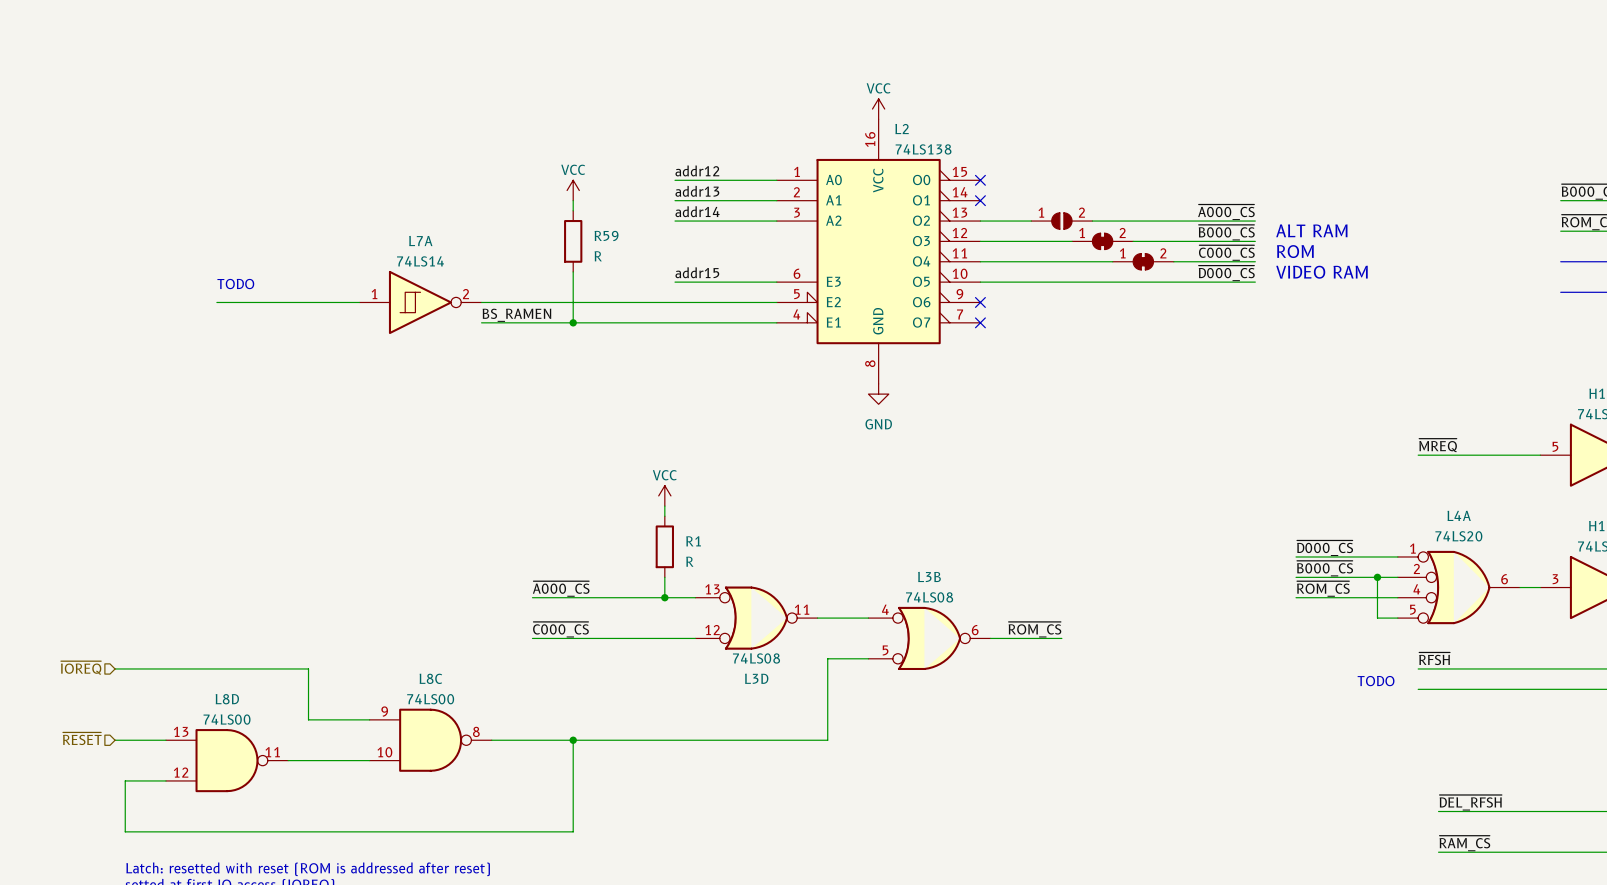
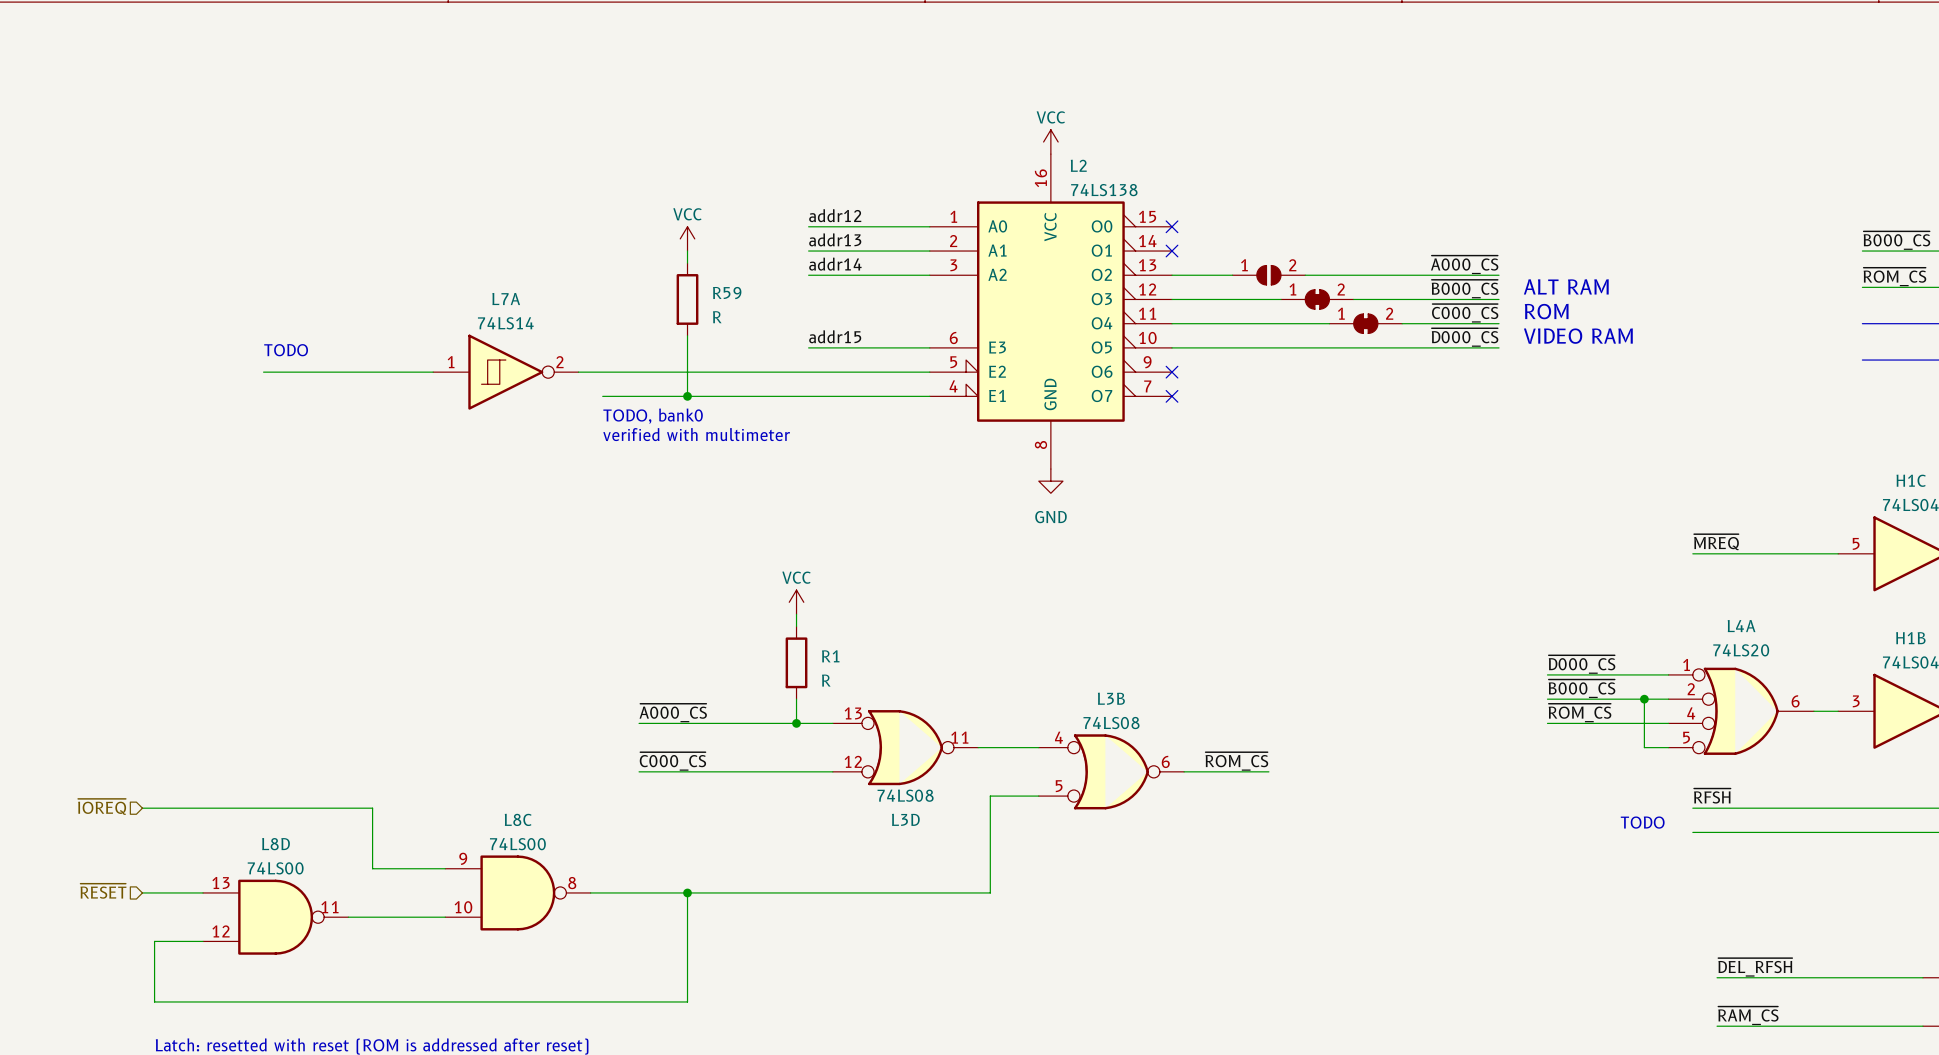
label: BS_RAMEN (516, 315) -> none
wire: (481, 322) (501, 322) -> none
text: none -> TODO, bank0 (653, 416)
text: none -> verified with multimeter (696, 434)

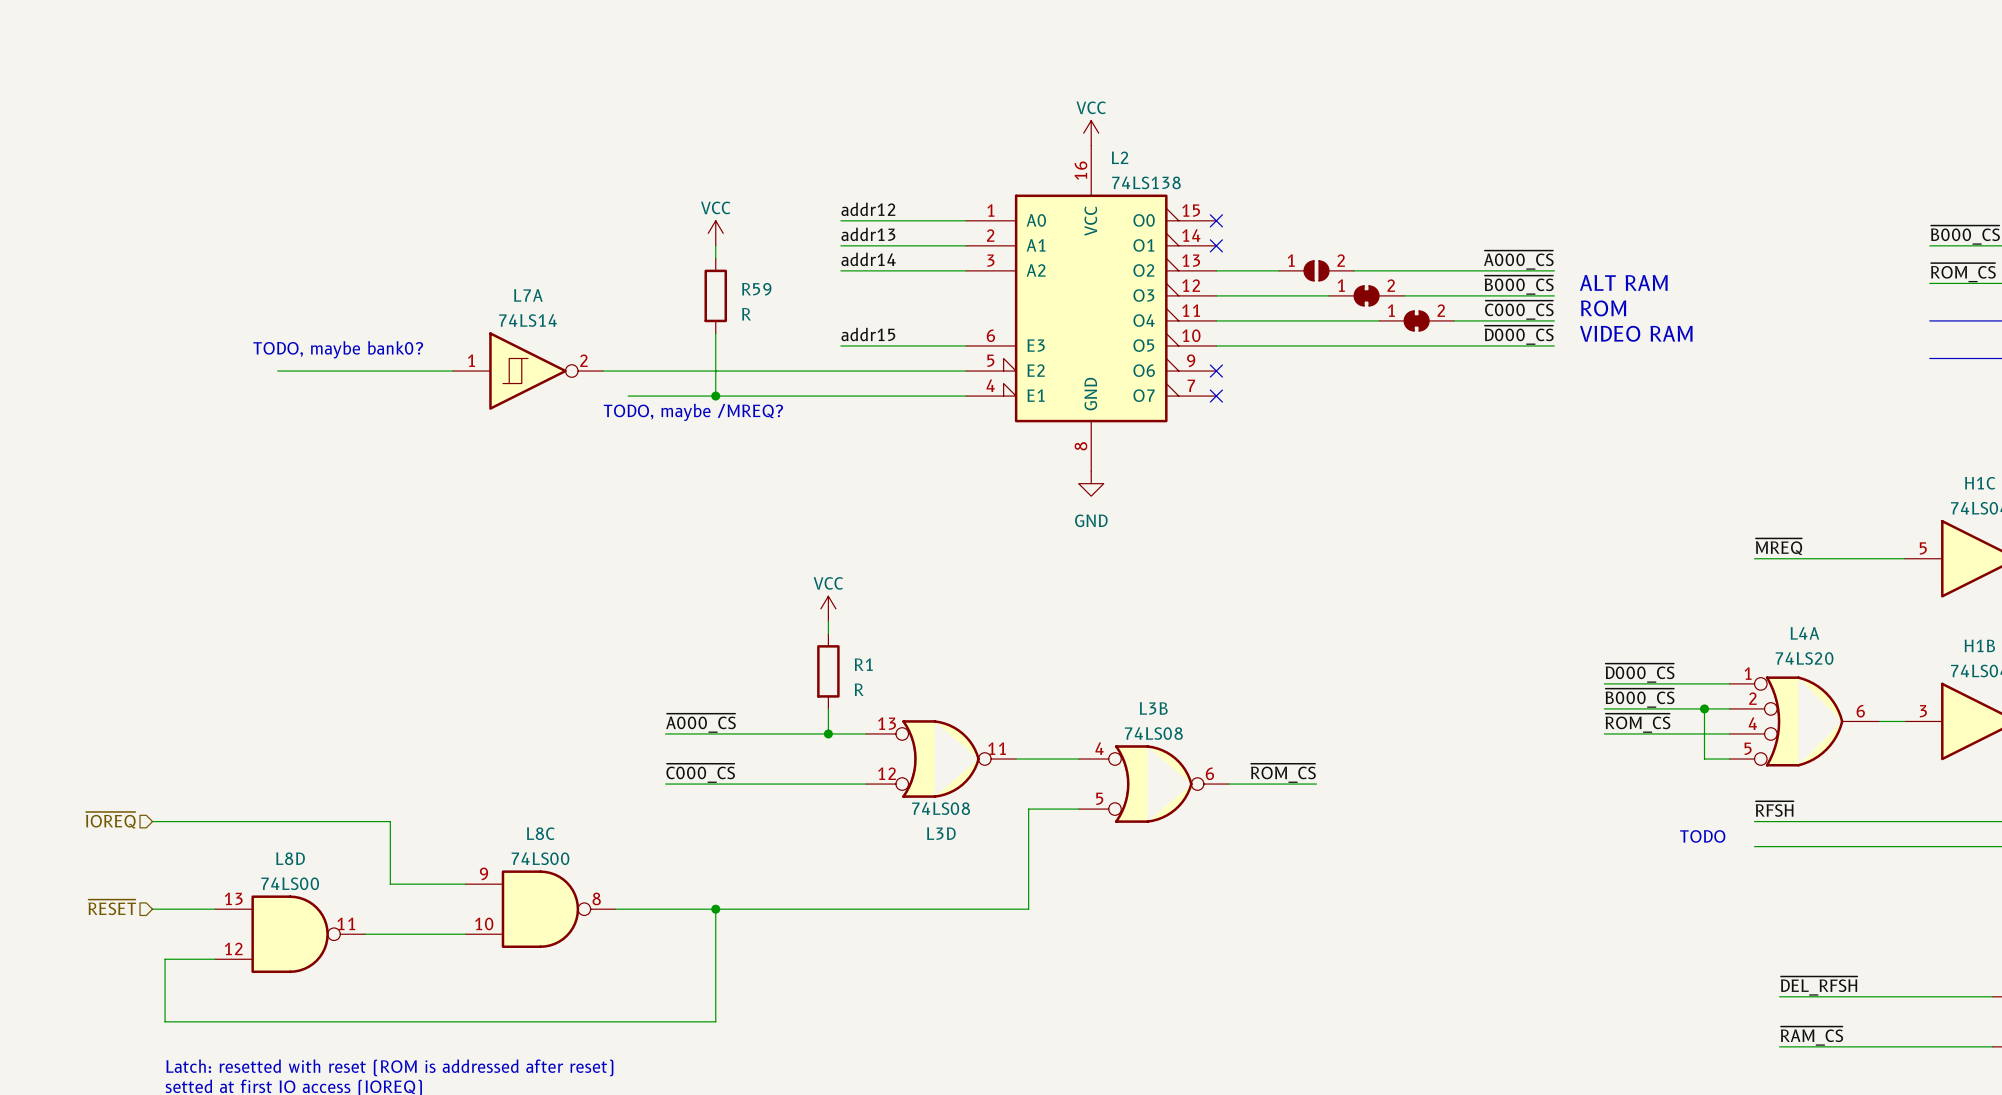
text: TODO (286, 350) -> none
text: none -> TODO, maybe bank0? (338, 349)
text: none -> TODO, maybe /MREQ? (693, 412)
text: TODO, bank0 (653, 416) -> none
text: verified with multimeter (696, 434) -> none

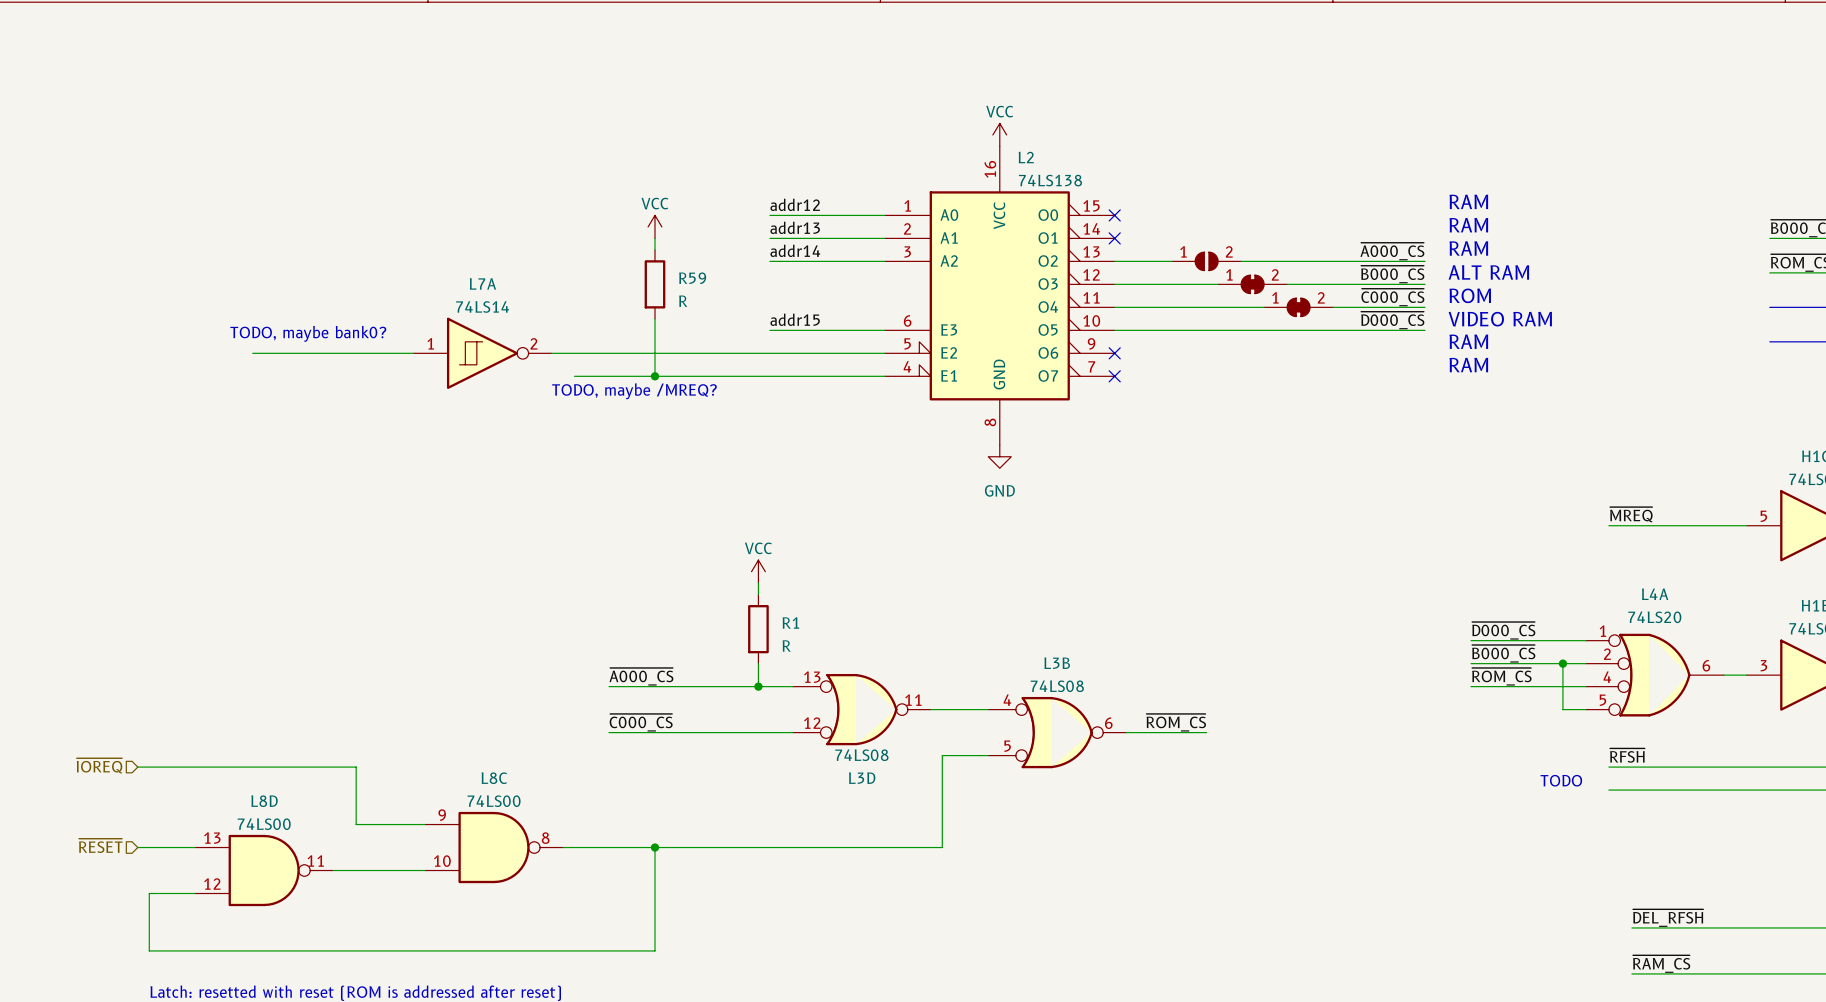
text: none -> RAM (1468, 201)
text: none -> RAM (1468, 225)
text: none -> RAM (1468, 248)
text: none -> RAM (1468, 341)
text: none -> RAM (1468, 365)

